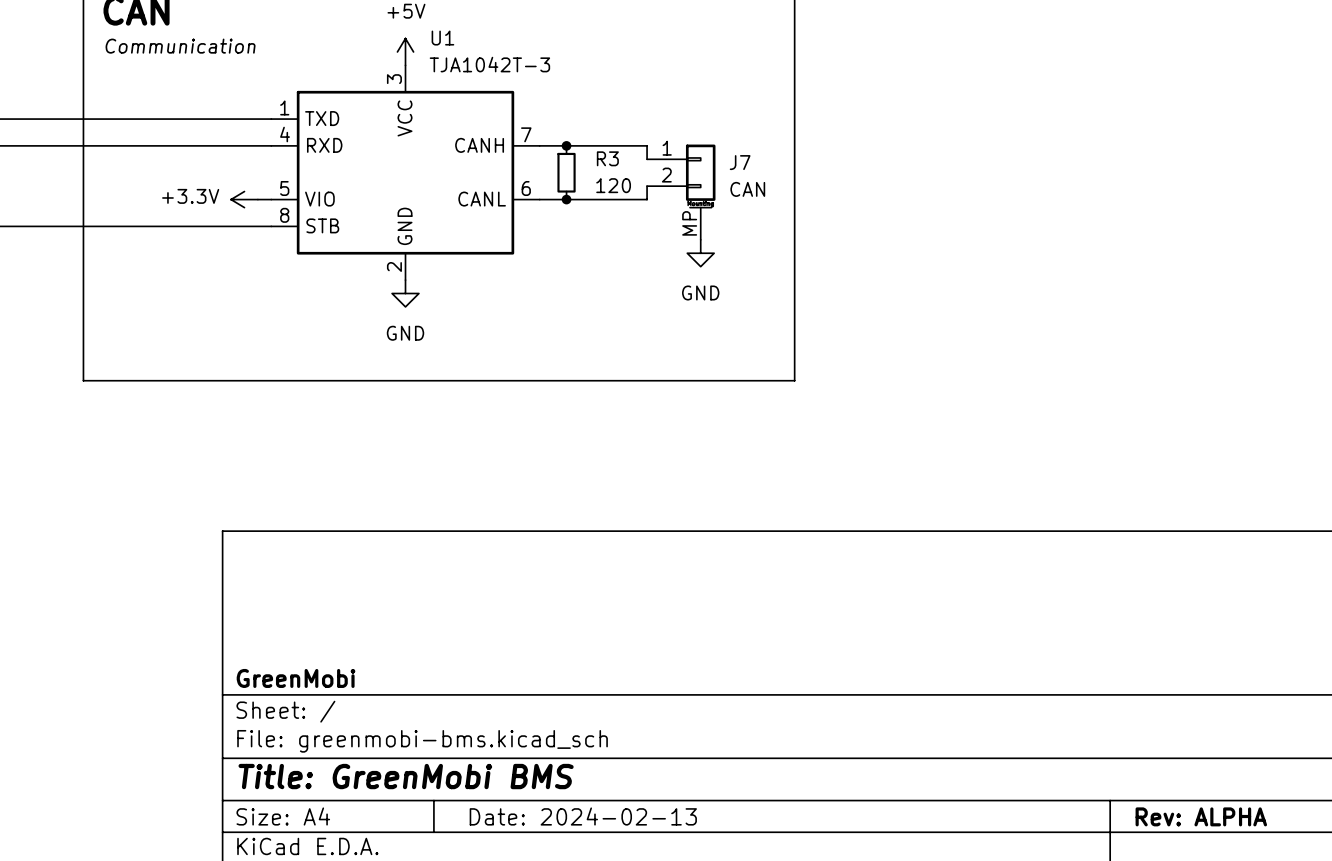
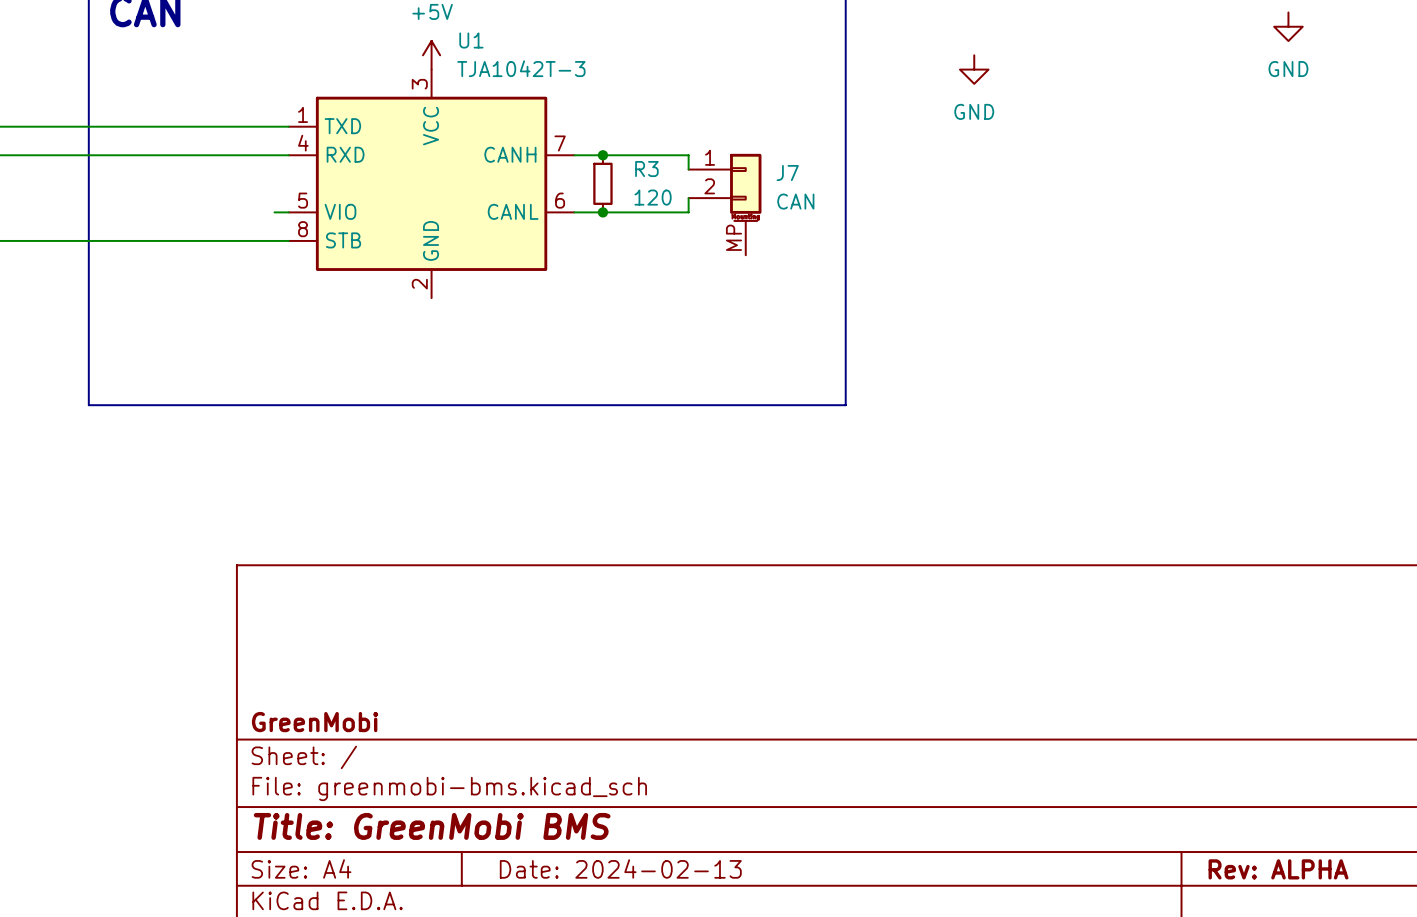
power symbol: none -> GND (1288, 26)
text: Communication (180, 46) -> none
power symbol: none -> GND (974, 69)
power symbol: +3.3V (244, 199) -> none
power symbol: GND (700, 253) -> none
power symbol: GND (405, 293) -> none

